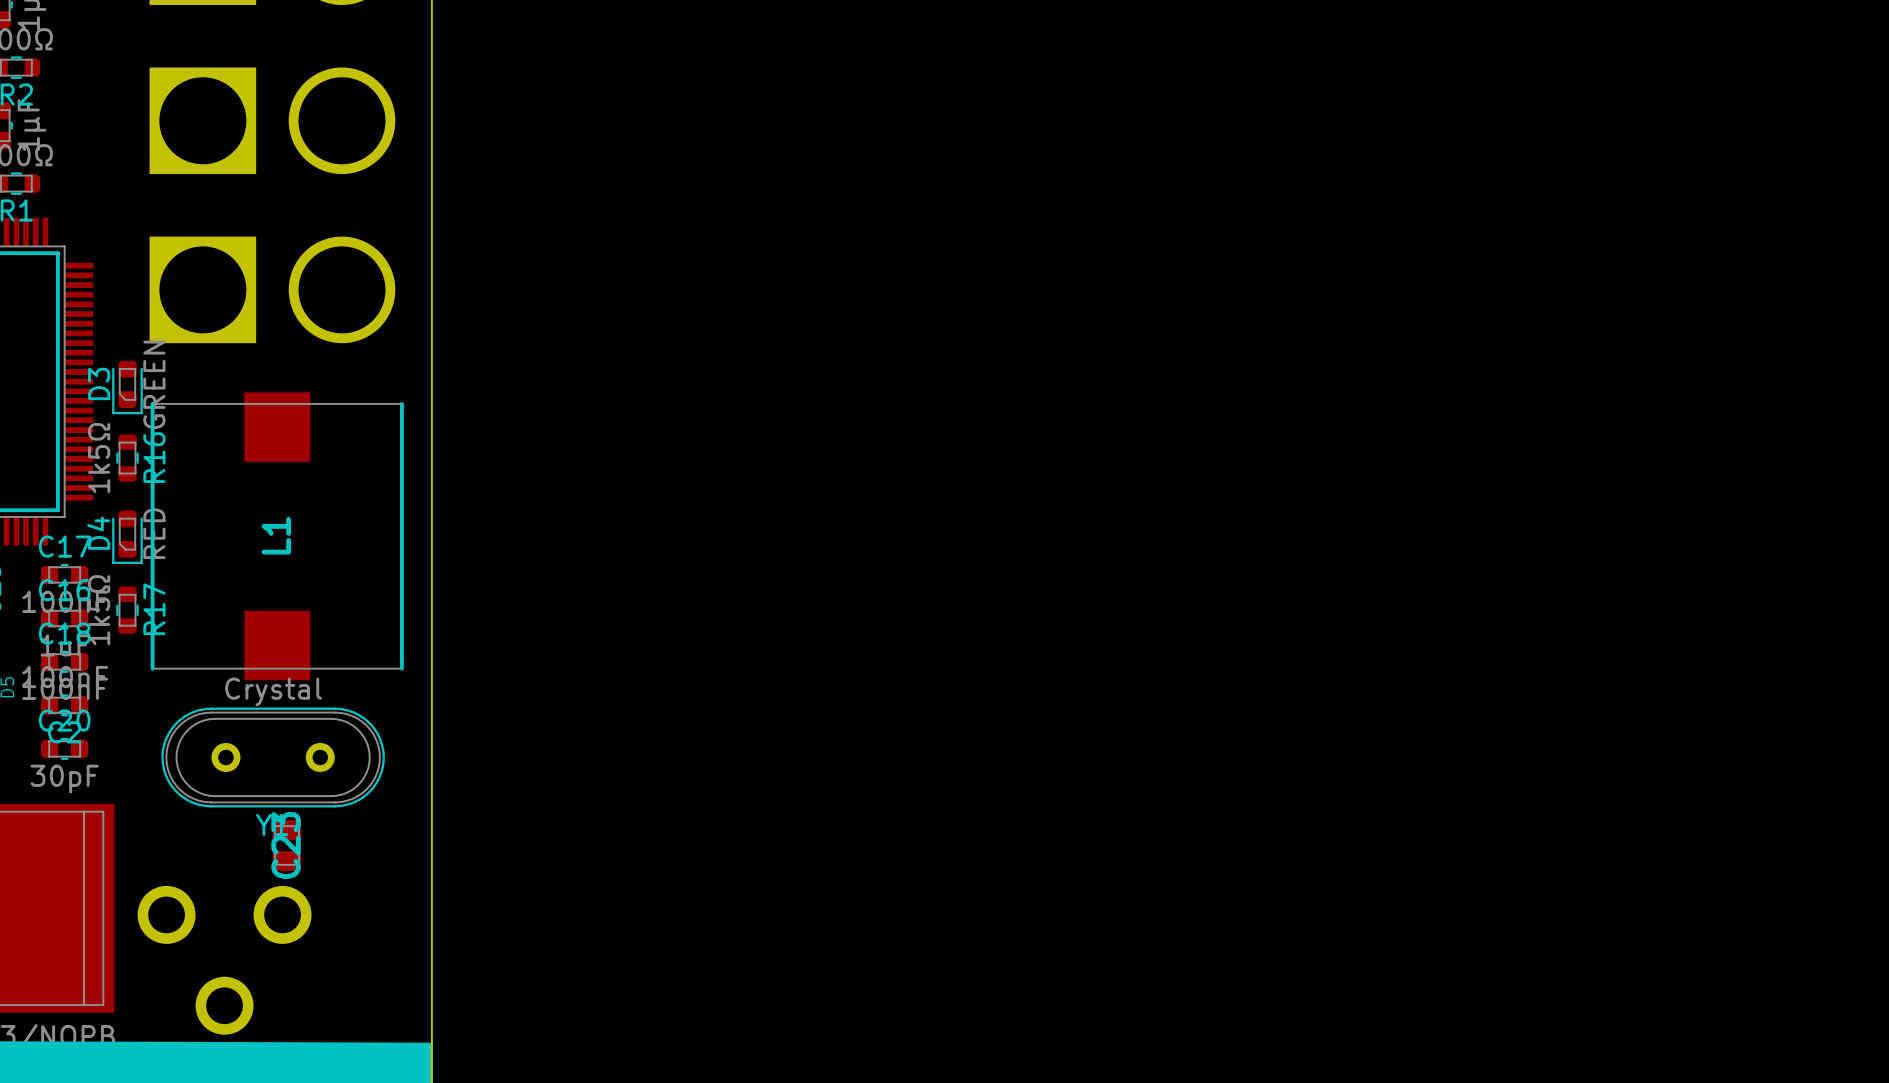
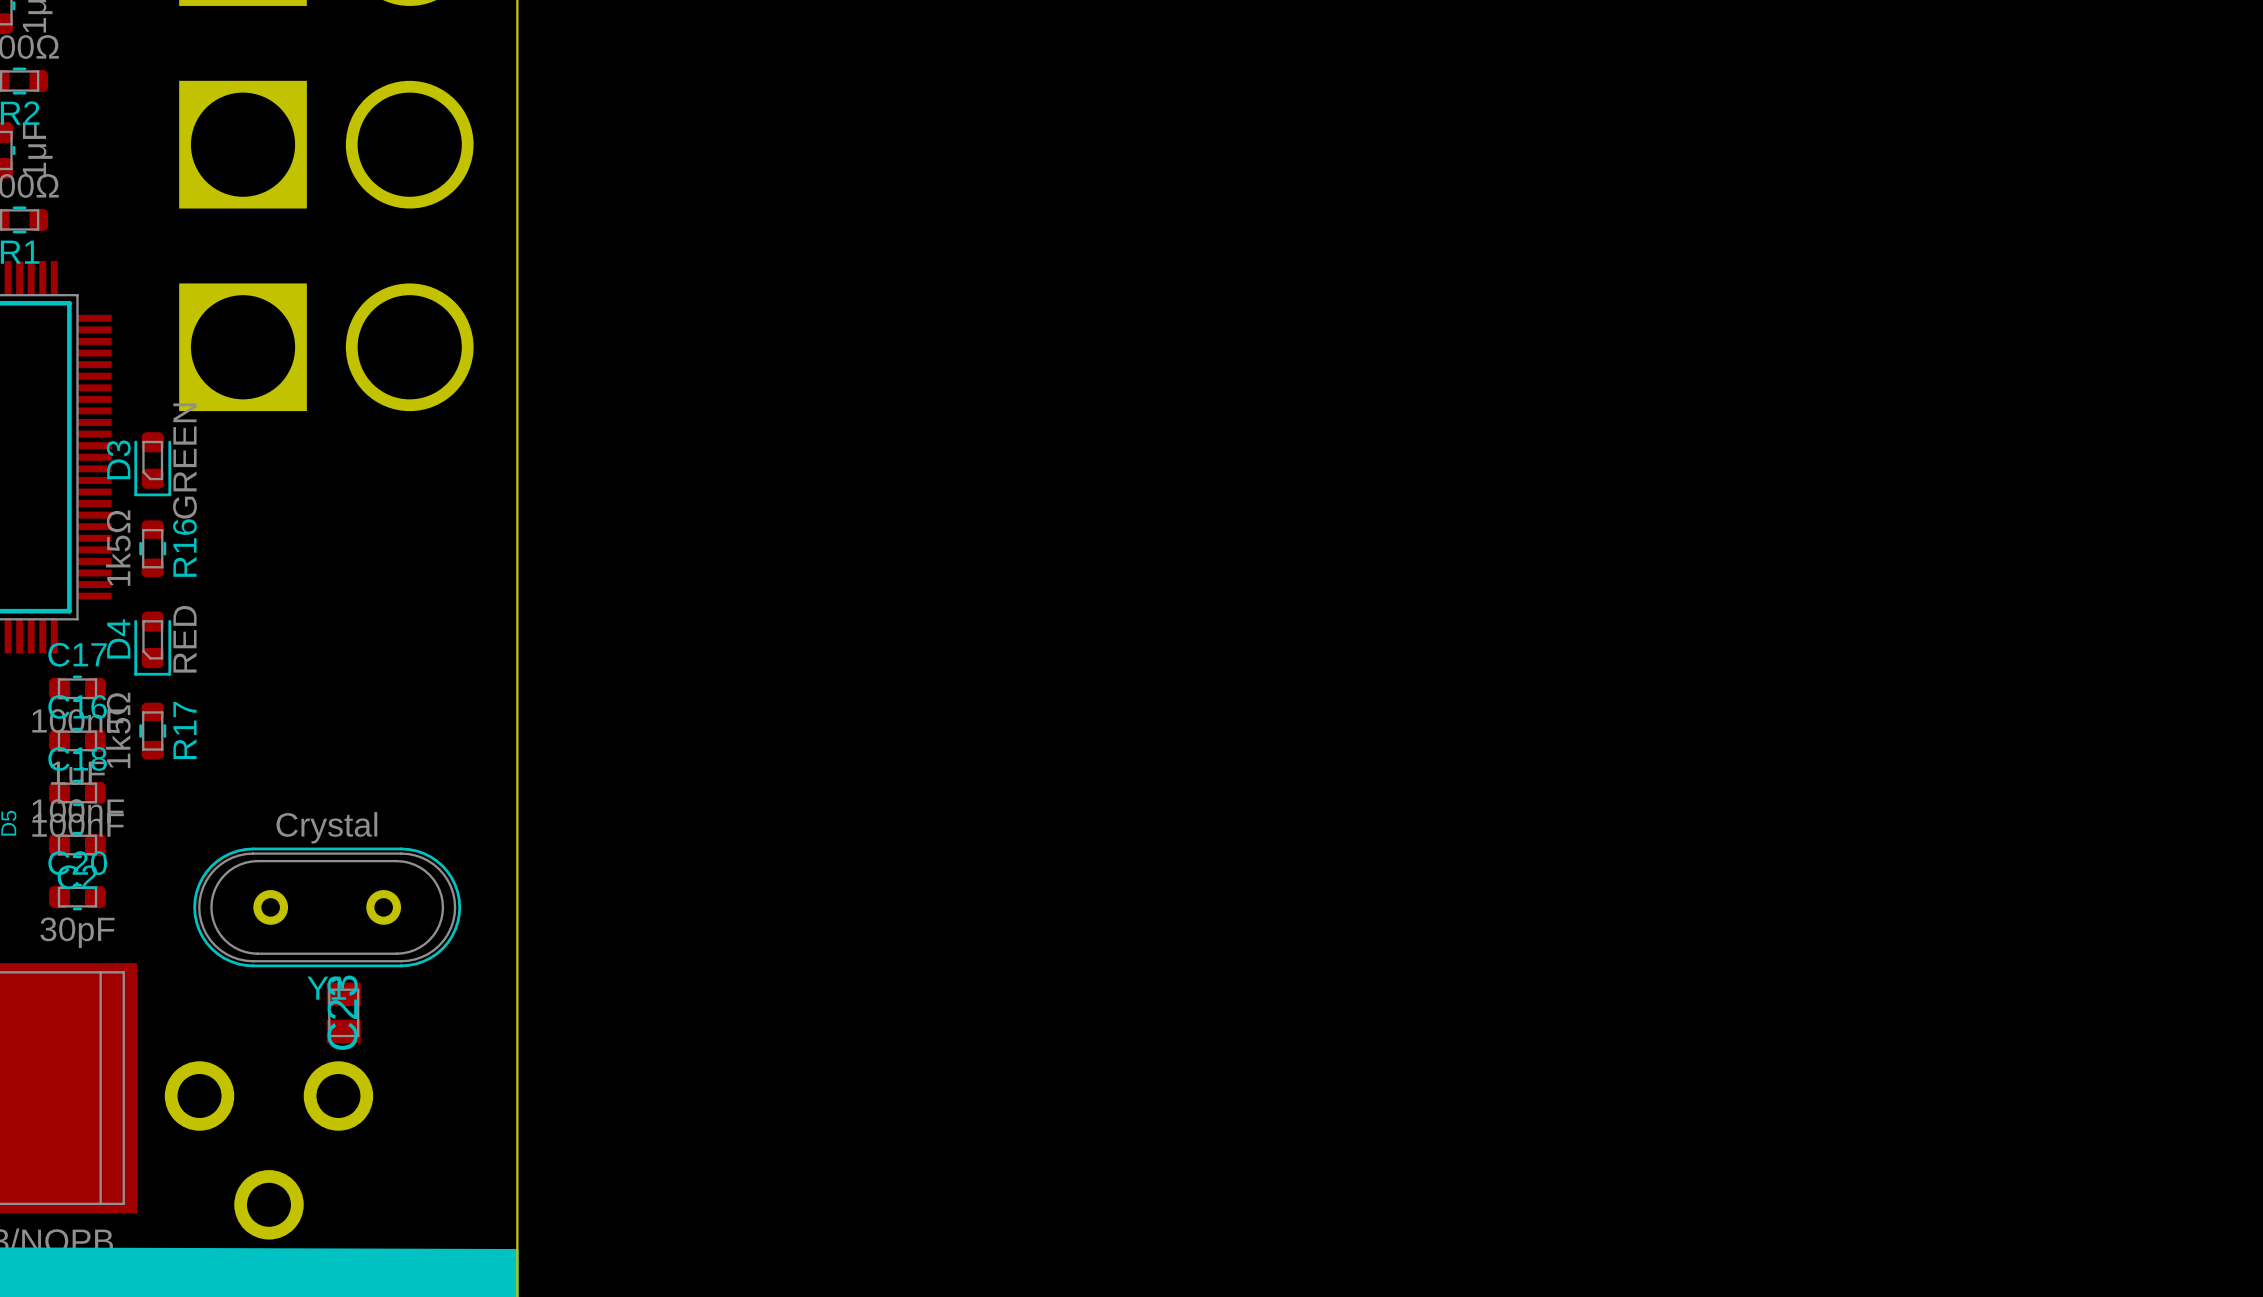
L1: (277, 536) -> none

